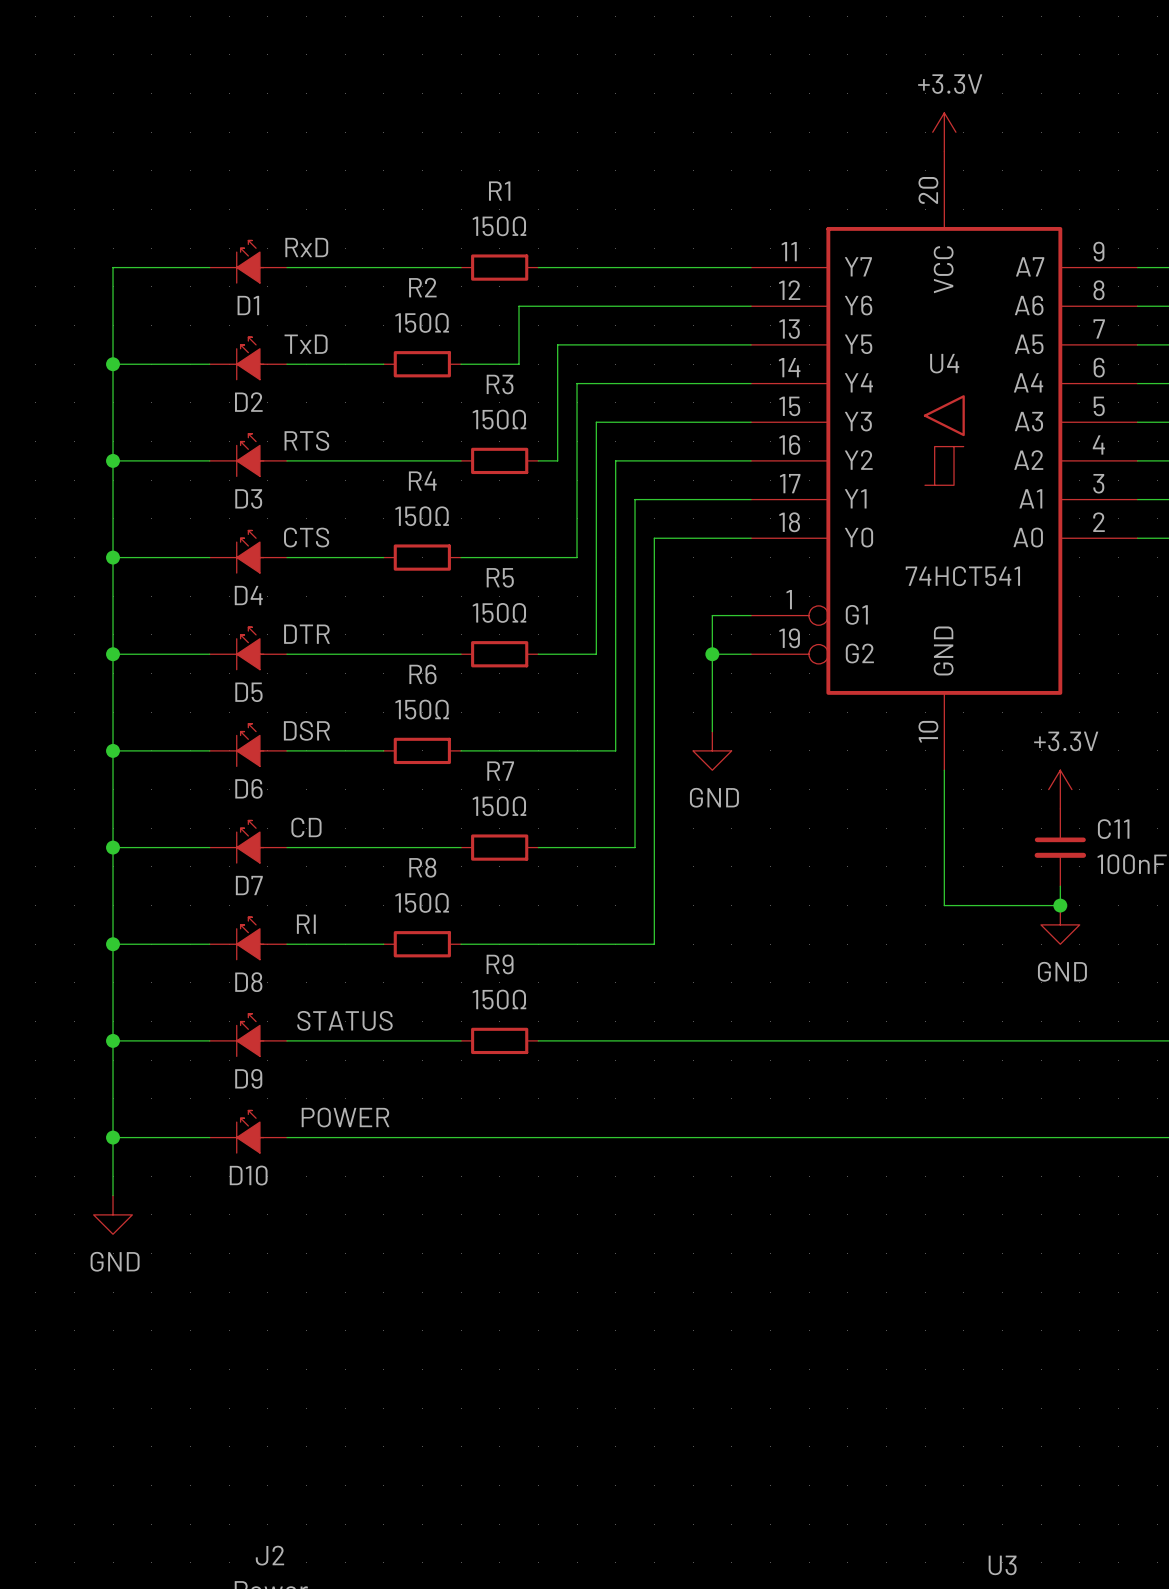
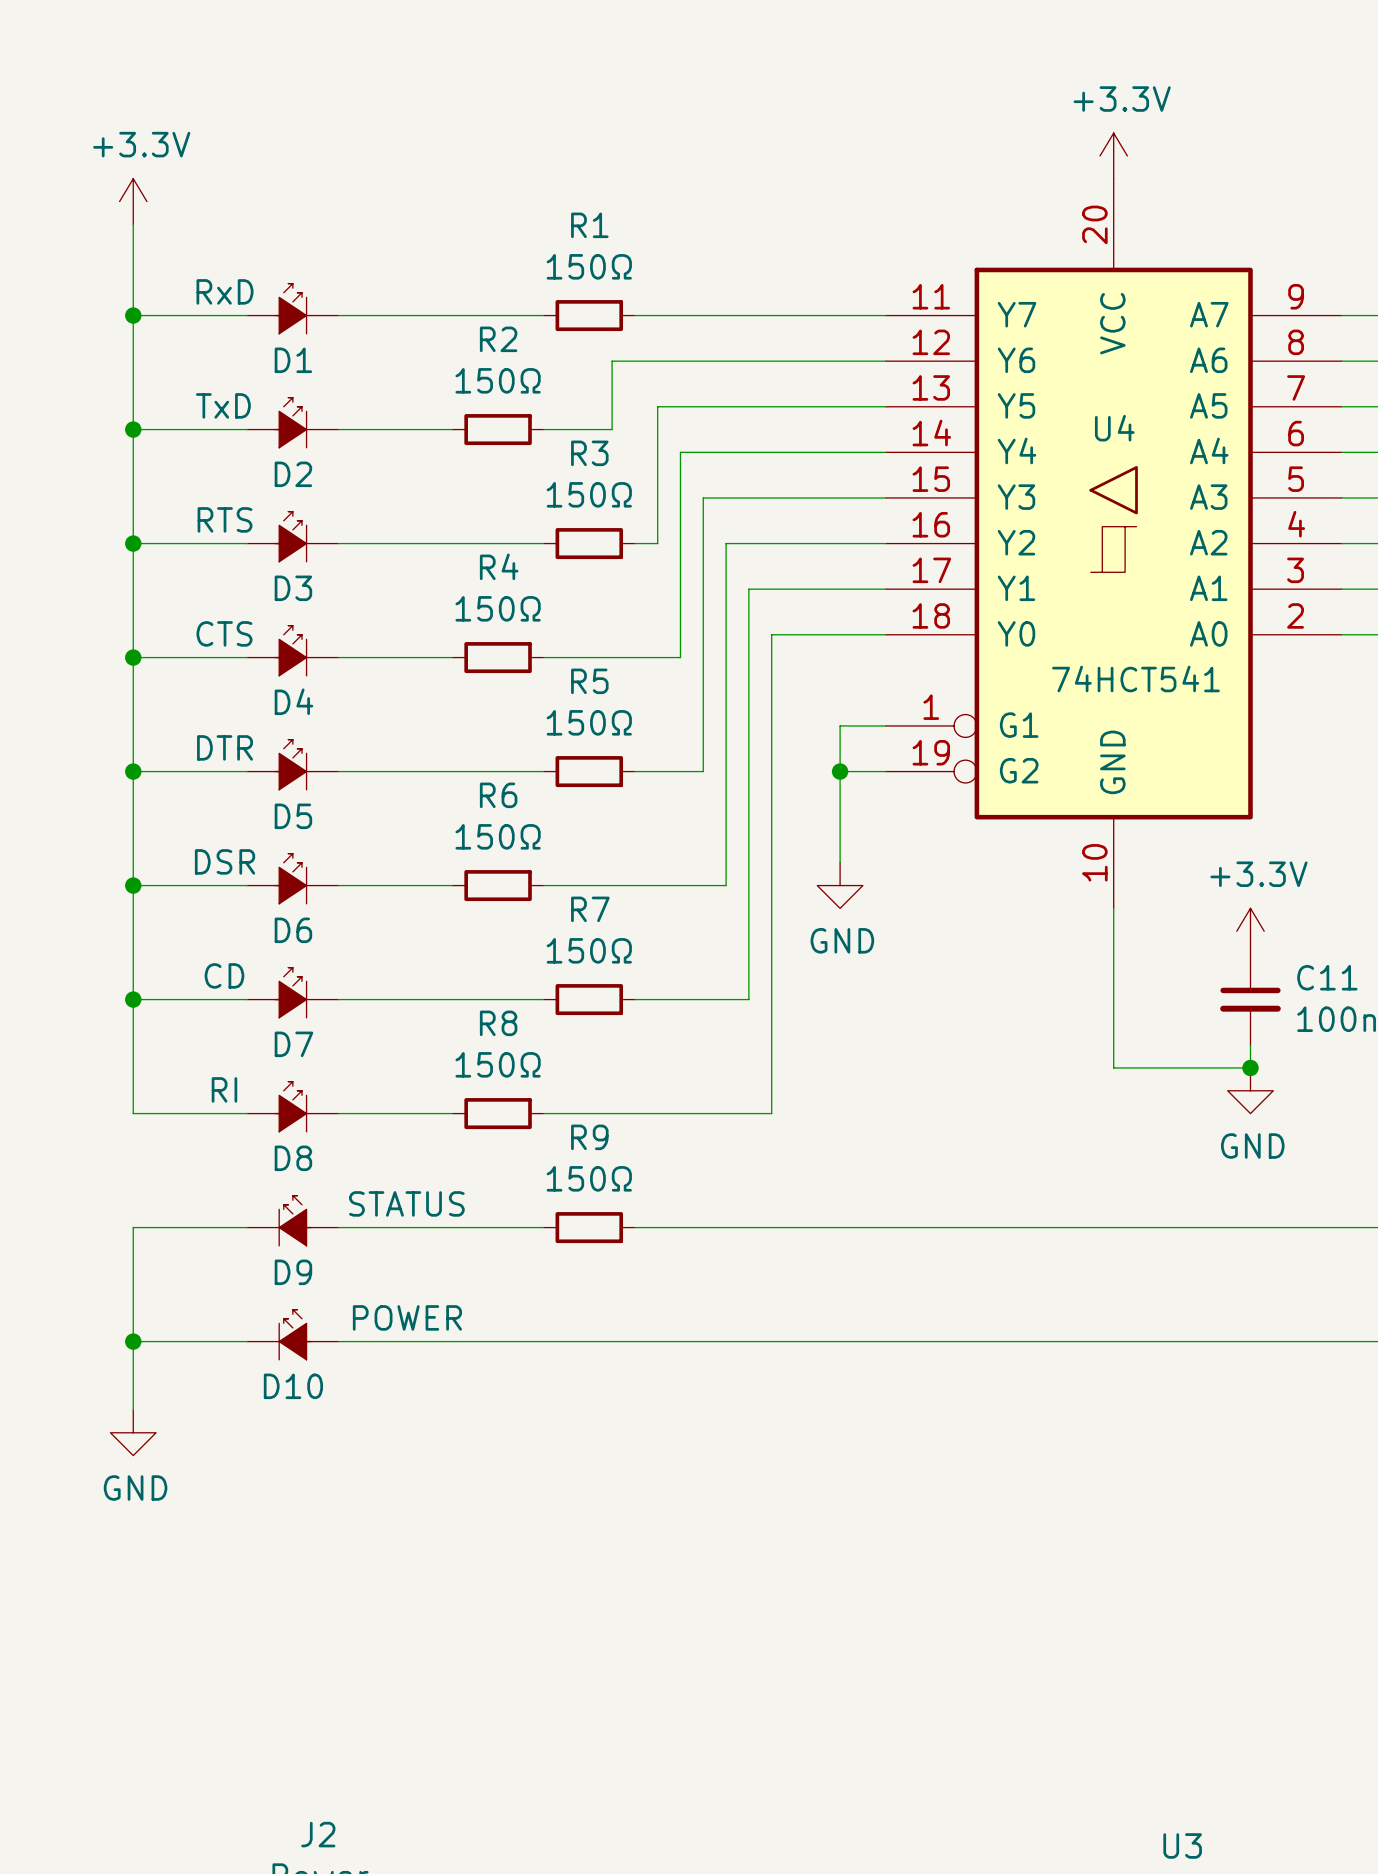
power symbol: none -> +3.3V (133, 201)
wire: none -> (133, 224) (133, 315)
D1 flip: as is (250, 261) -> left-right (290, 308)
junction: none -> (133, 315)
D2 flip: as is (250, 358) -> left-right (290, 422)
D3 flip: as is (250, 455) -> left-right (290, 536)
D4 flip: as is (250, 551) -> left-right (290, 650)
D5 flip: as is (250, 648) -> left-right (290, 764)
D6 flip: as is (250, 745) -> left-right (290, 878)
D7 flip: as is (250, 841) -> left-right (290, 992)
D8 flip: as is (250, 938) -> left-right (290, 1106)
wire: (113, 944) (113, 1040) -> none
junction: (113, 944) -> none
junction: (113, 1040) -> none

